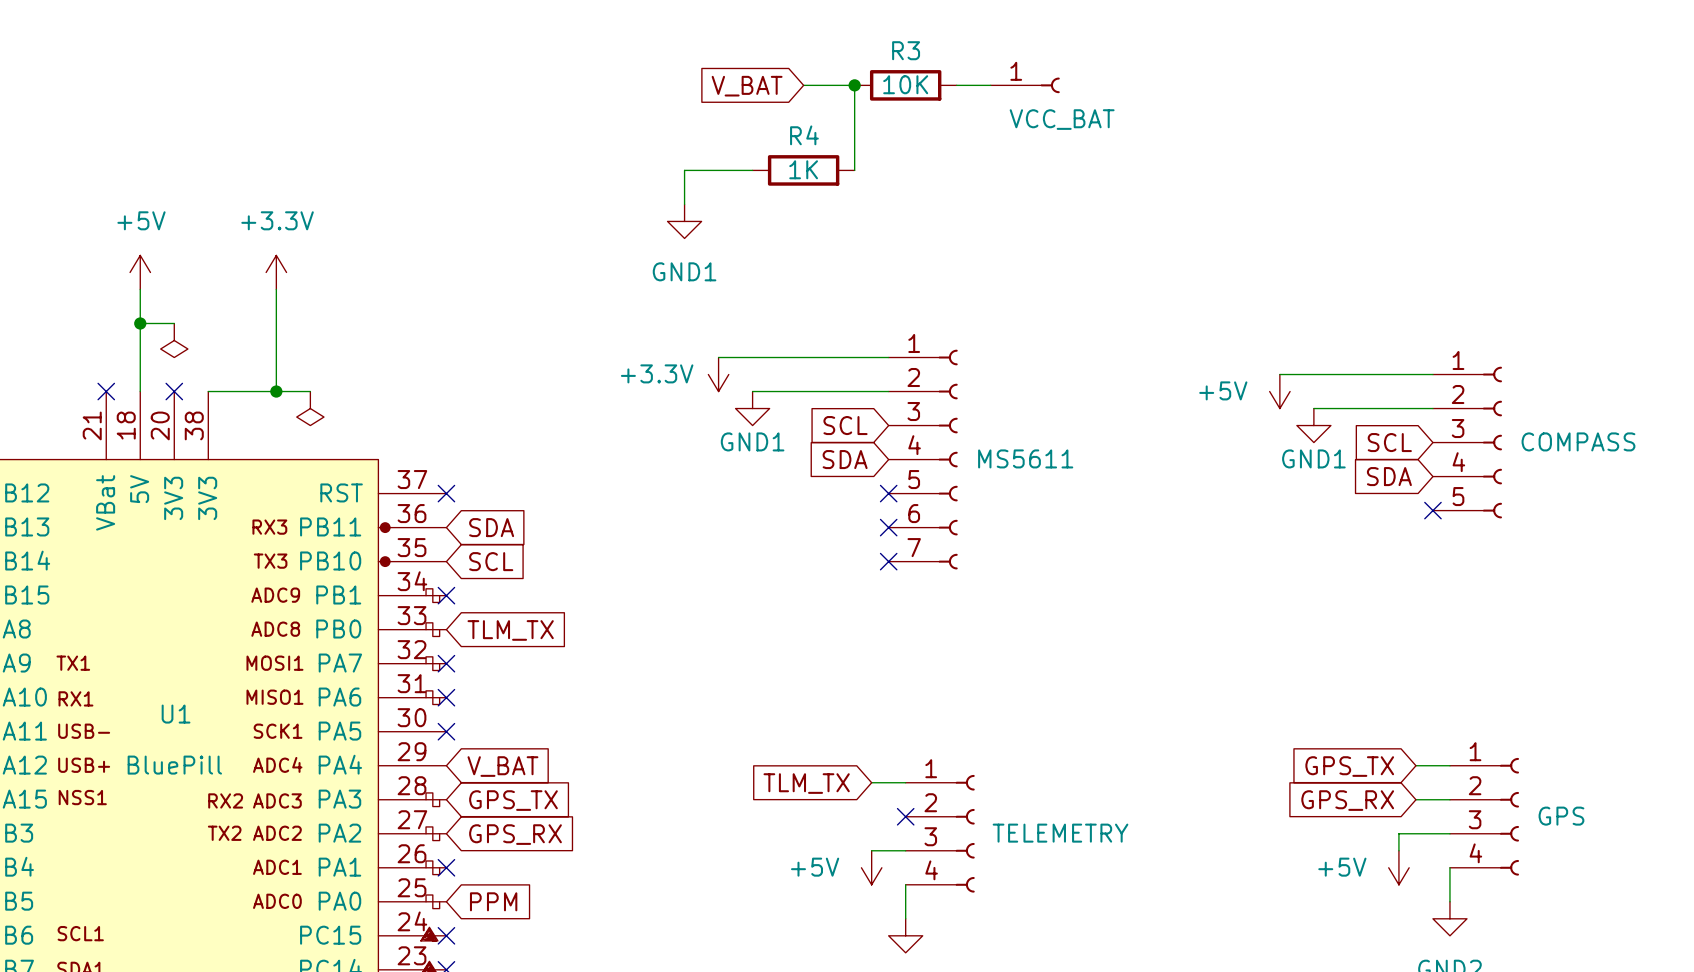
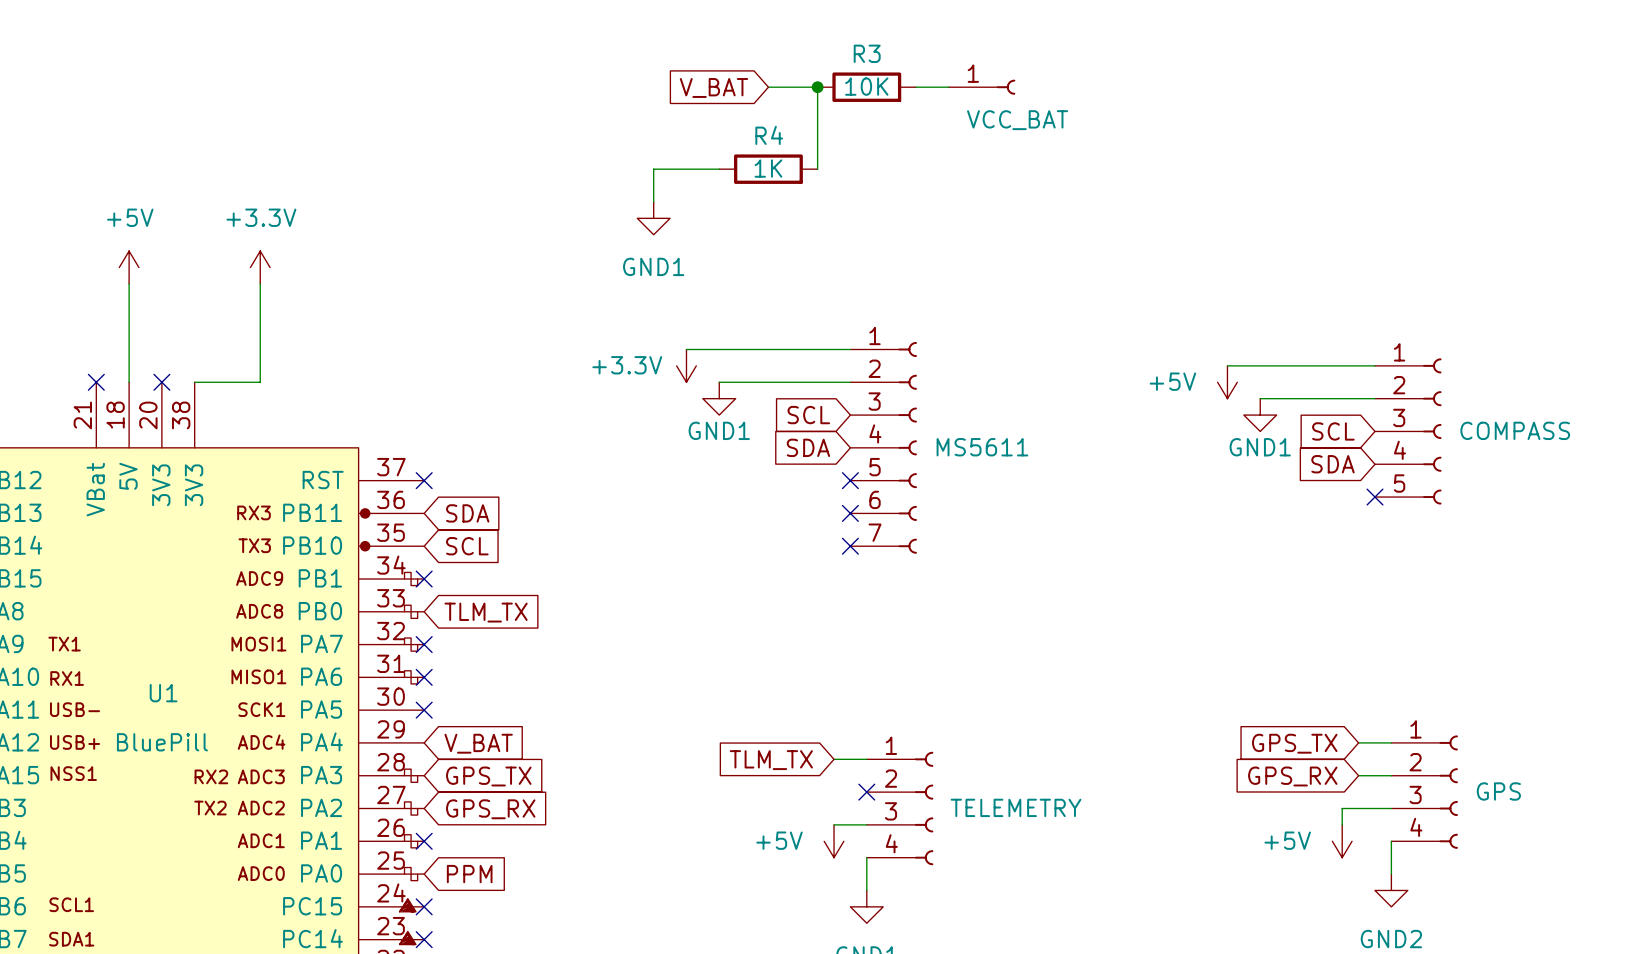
wire: (140, 323) (174, 323) -> none
junction: (140, 323) -> none
power symbol: (174, 340) -> none
wire: (276, 391) (310, 391) -> none
junction: (276, 391) -> none
power symbol: (310, 408) -> none

